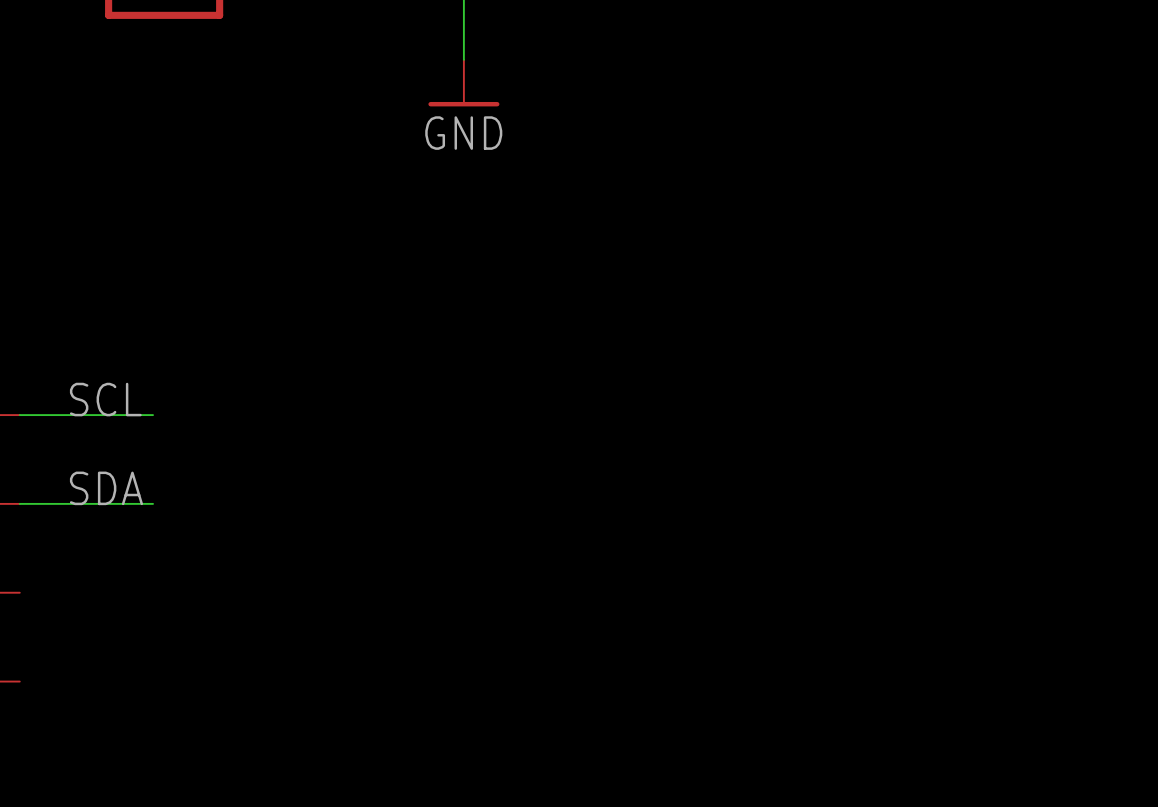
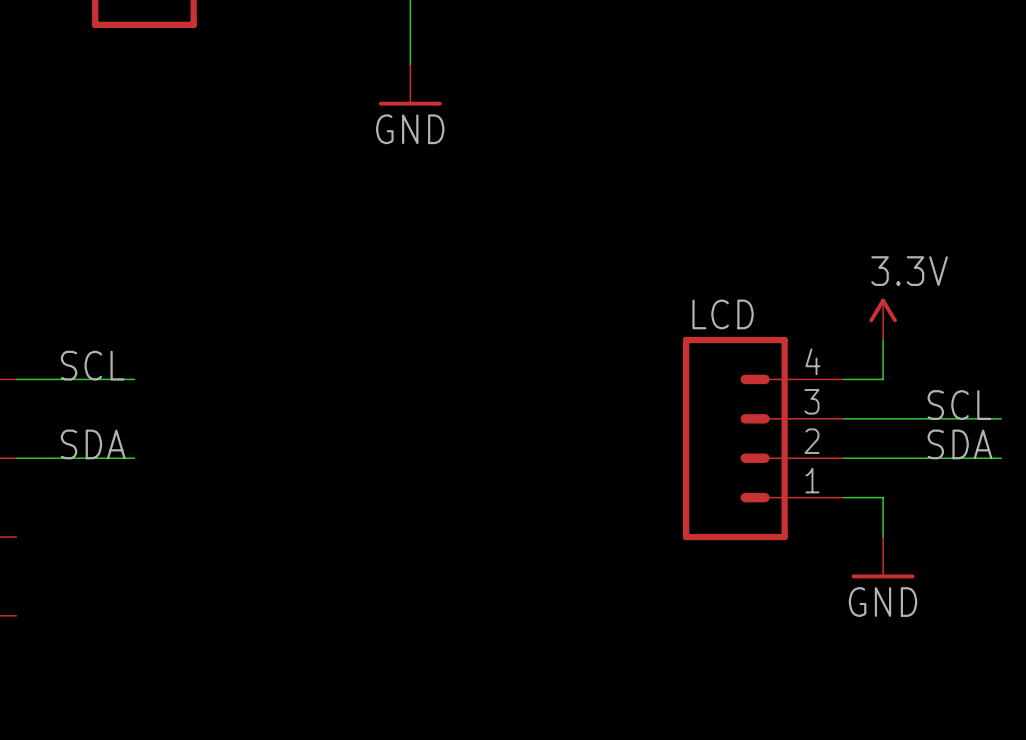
power symbol: none -> 3.3V (883, 319)
wire: none -> (883, 340) (883, 379) (843, 379)
label: none -> SCL (959, 405)
wire: none -> (843, 418) (1001, 418)
LCD: none -> (763, 438)
label: none -> SDA (960, 444)
wire: none -> (843, 458) (1001, 458)
wire: none -> (843, 497) (883, 497) (883, 537)
power symbol: none -> GND (883, 557)

